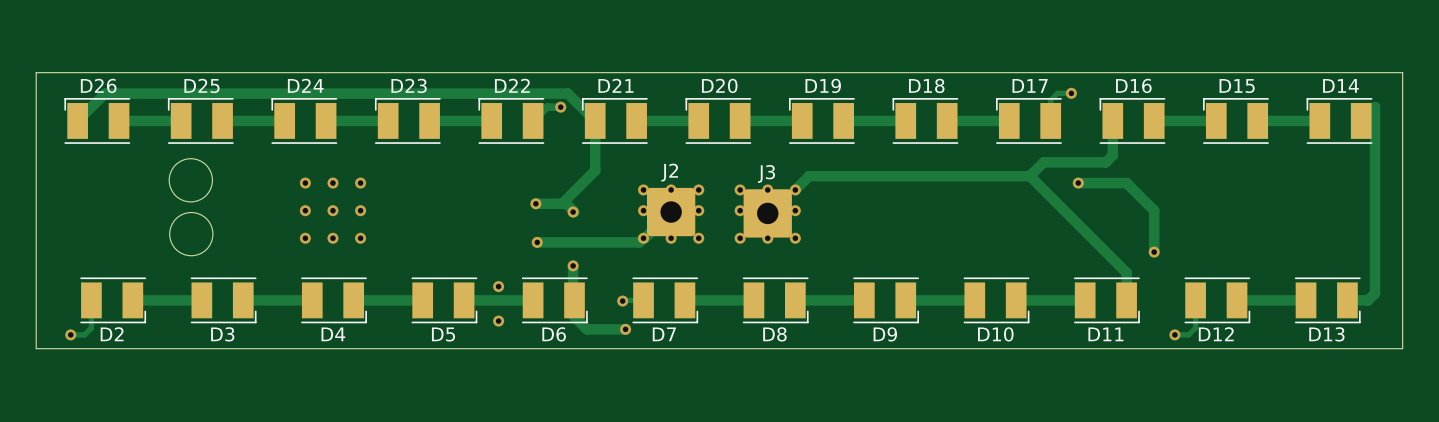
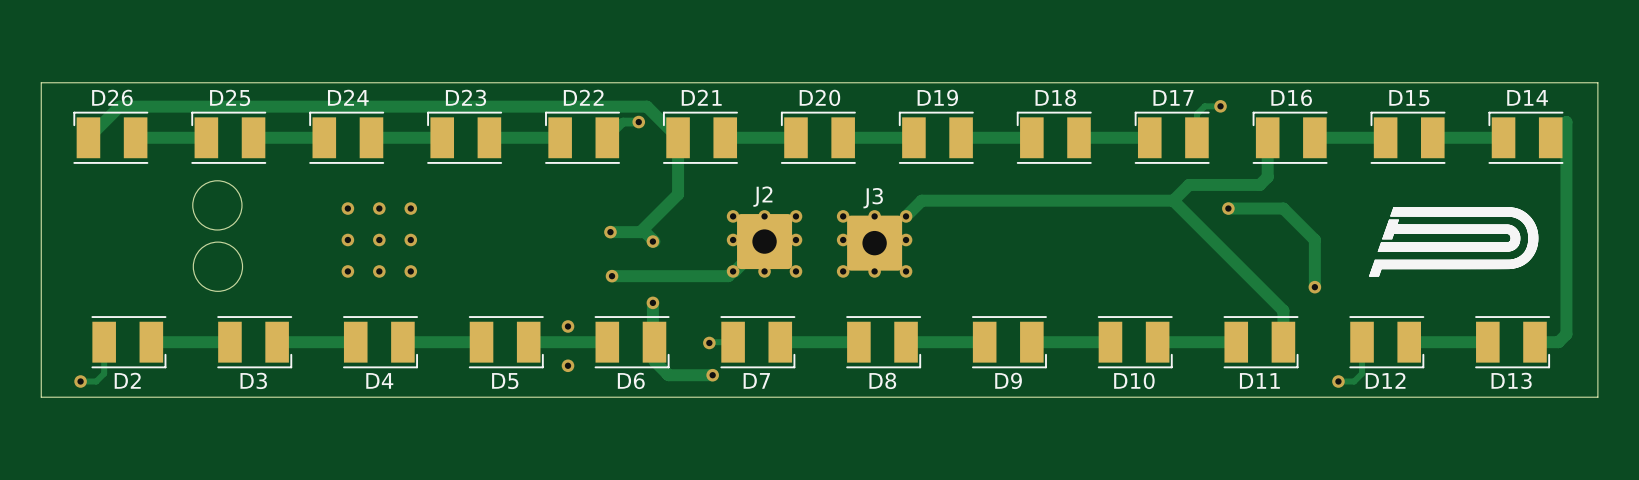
drawing: none -> [1368, 207, 1539, 277]

